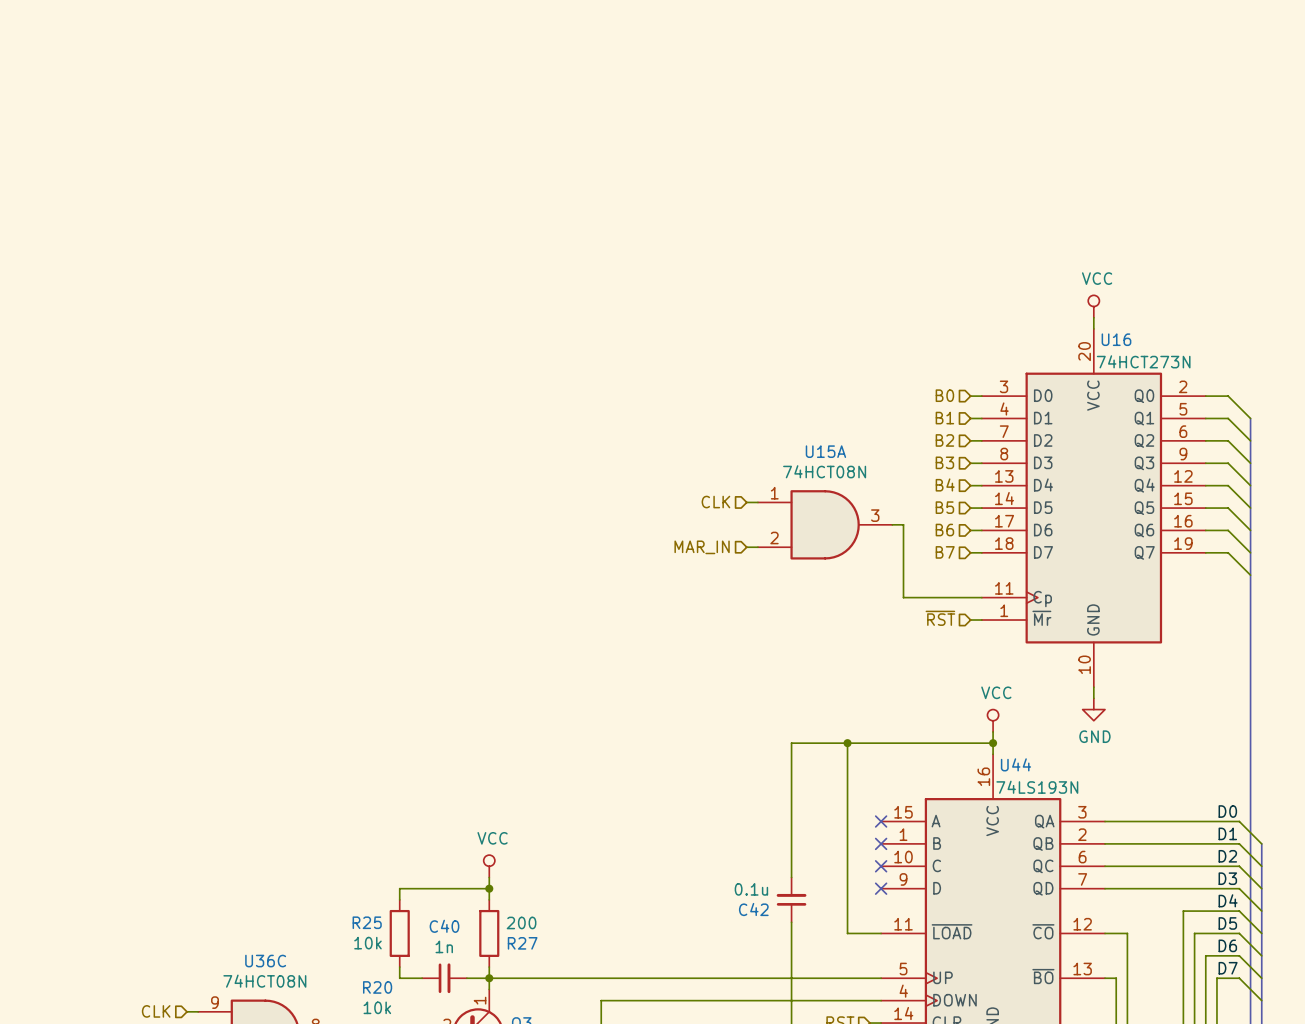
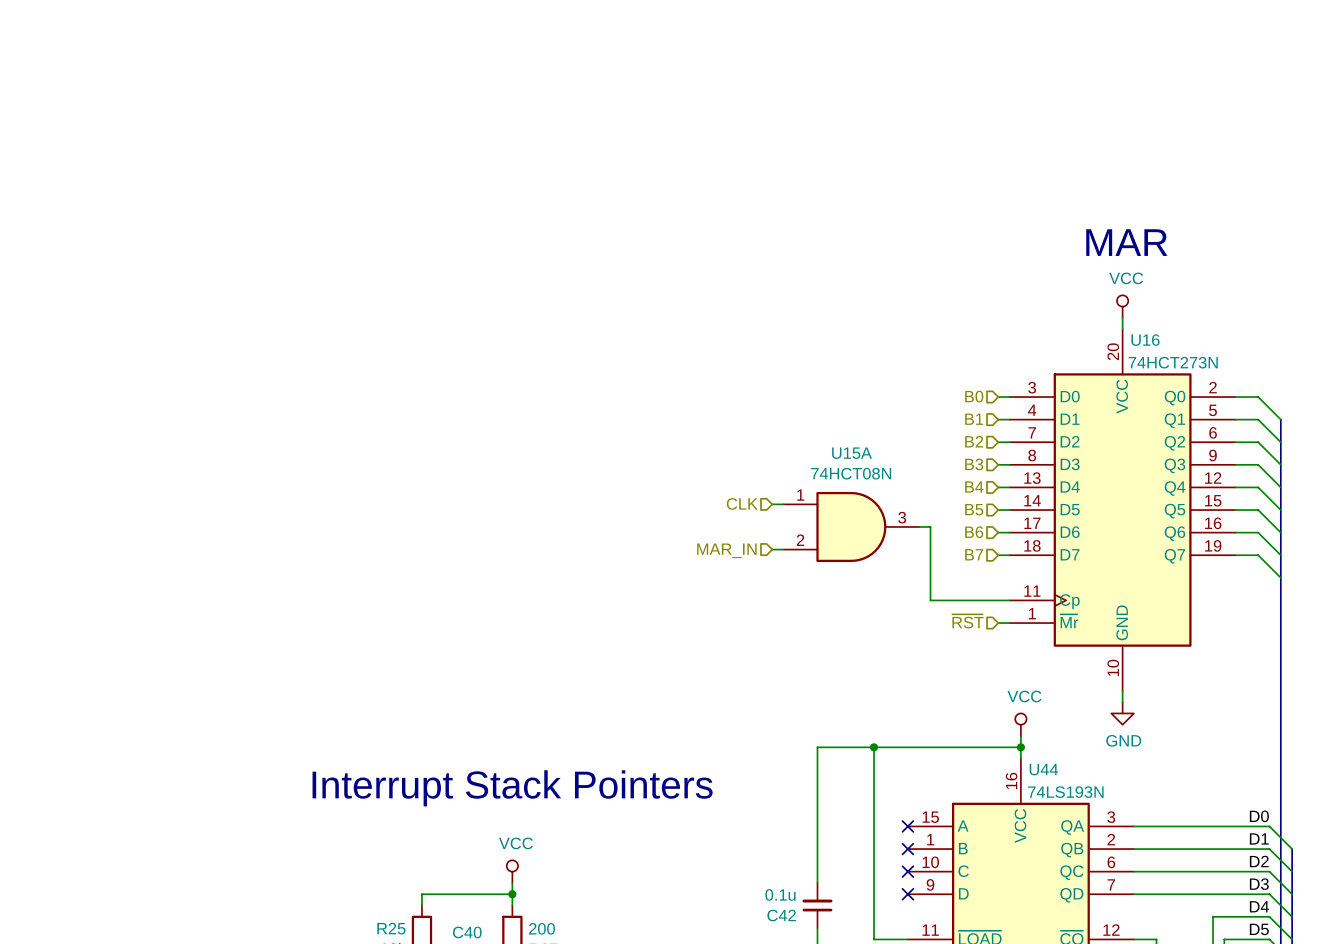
text: none -> MAR (1126, 242)
text: none -> Interrupt Stack Pointers (512, 788)

